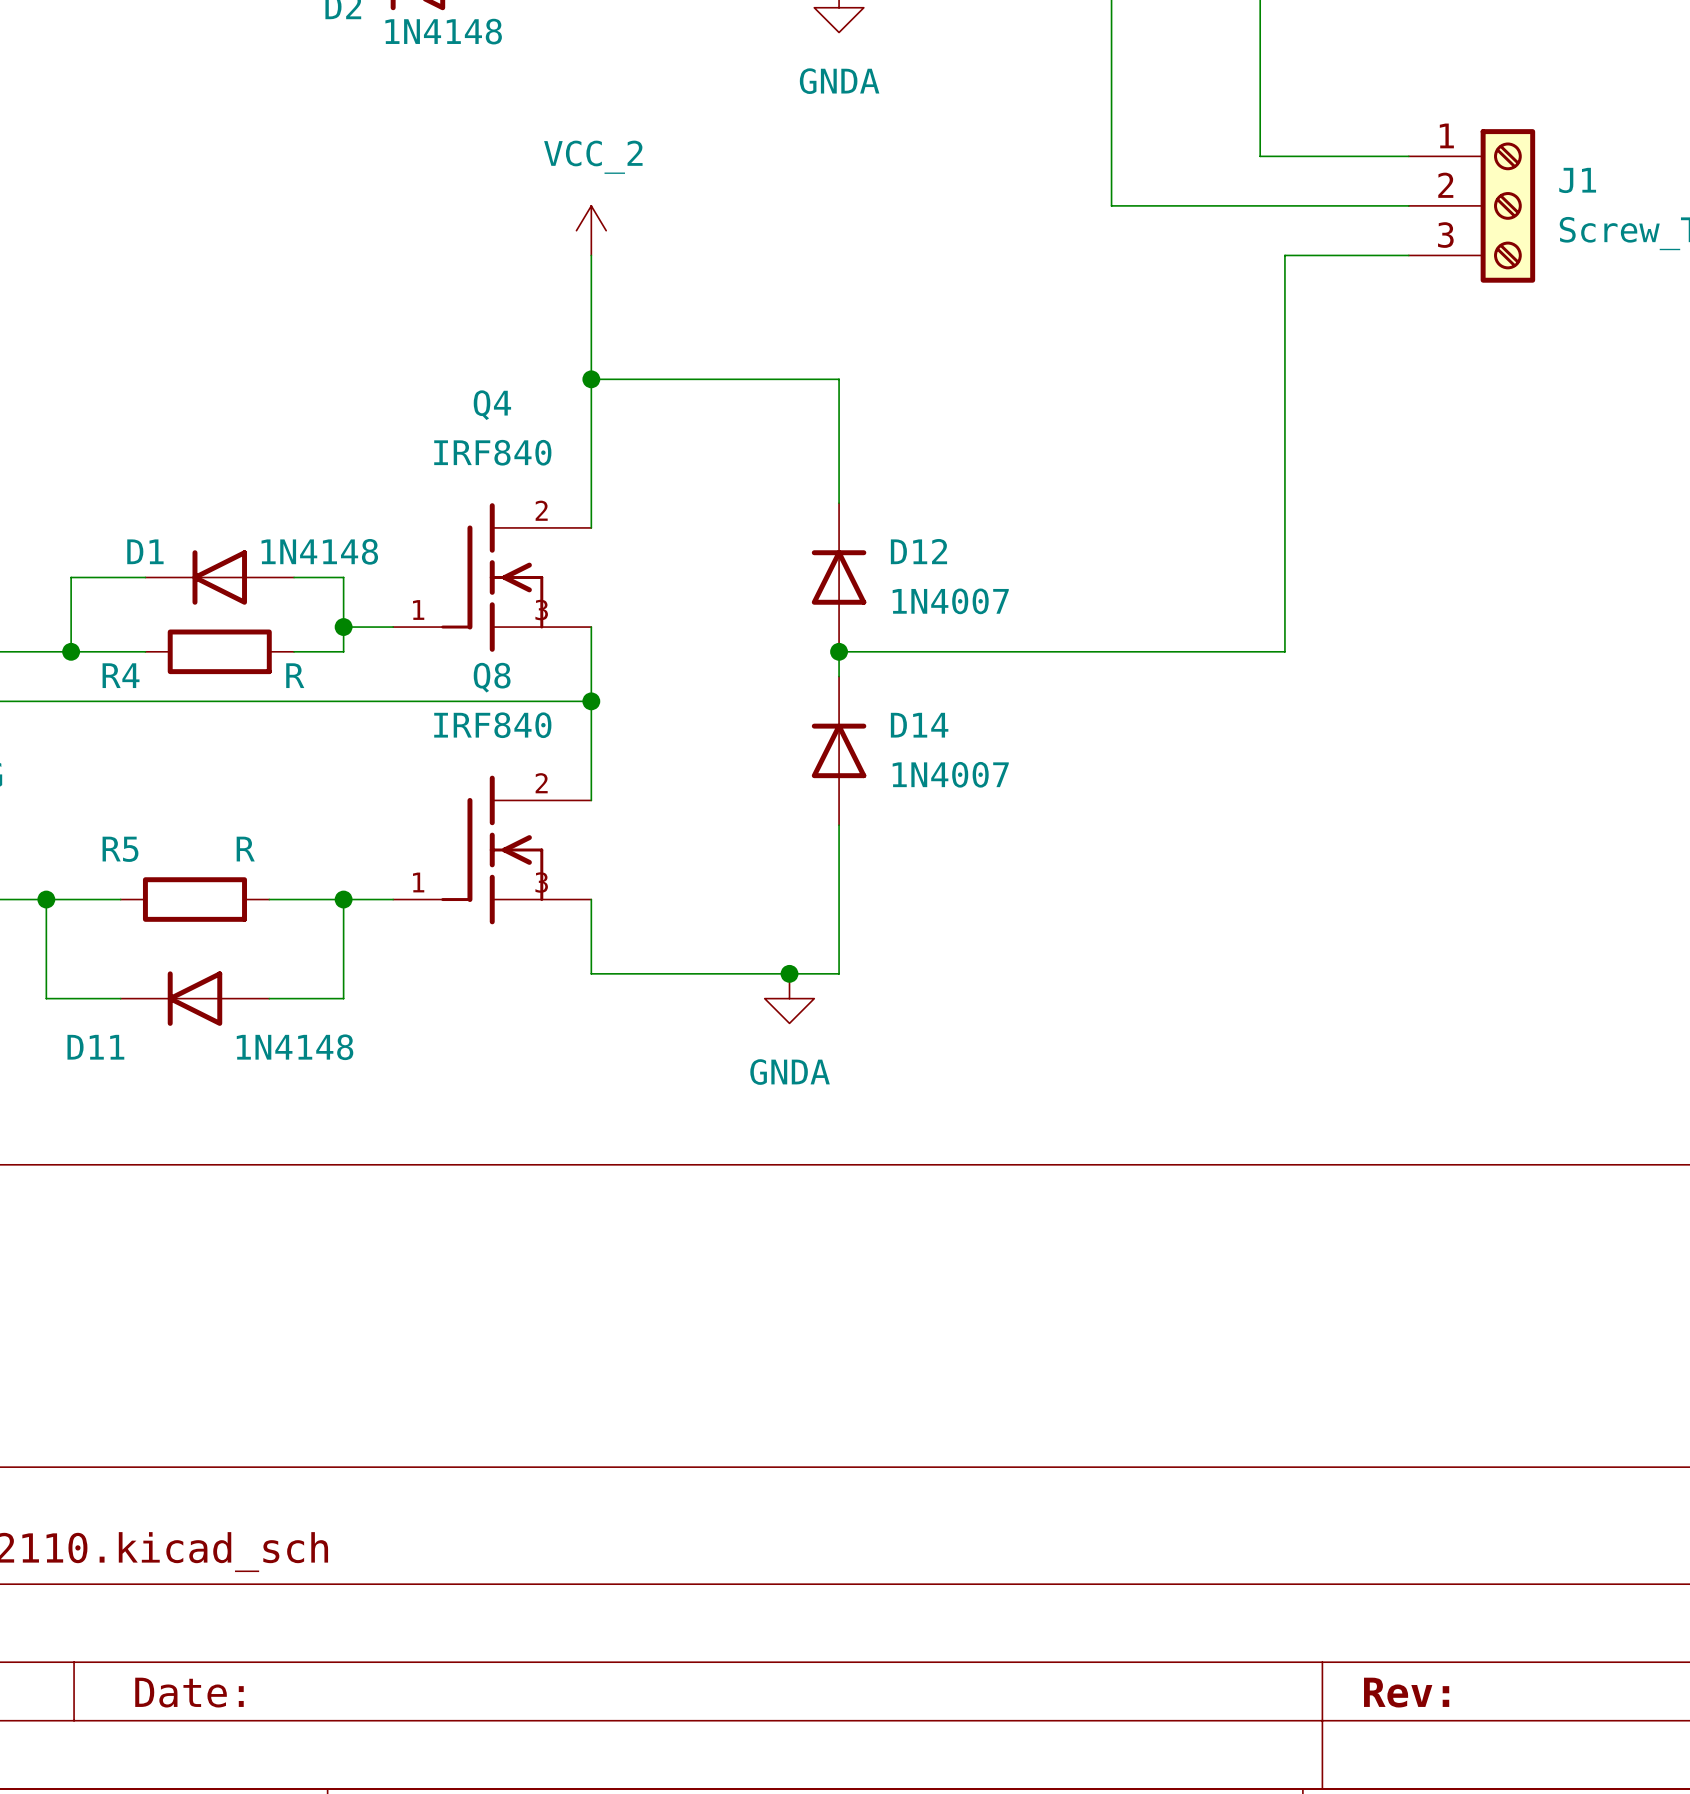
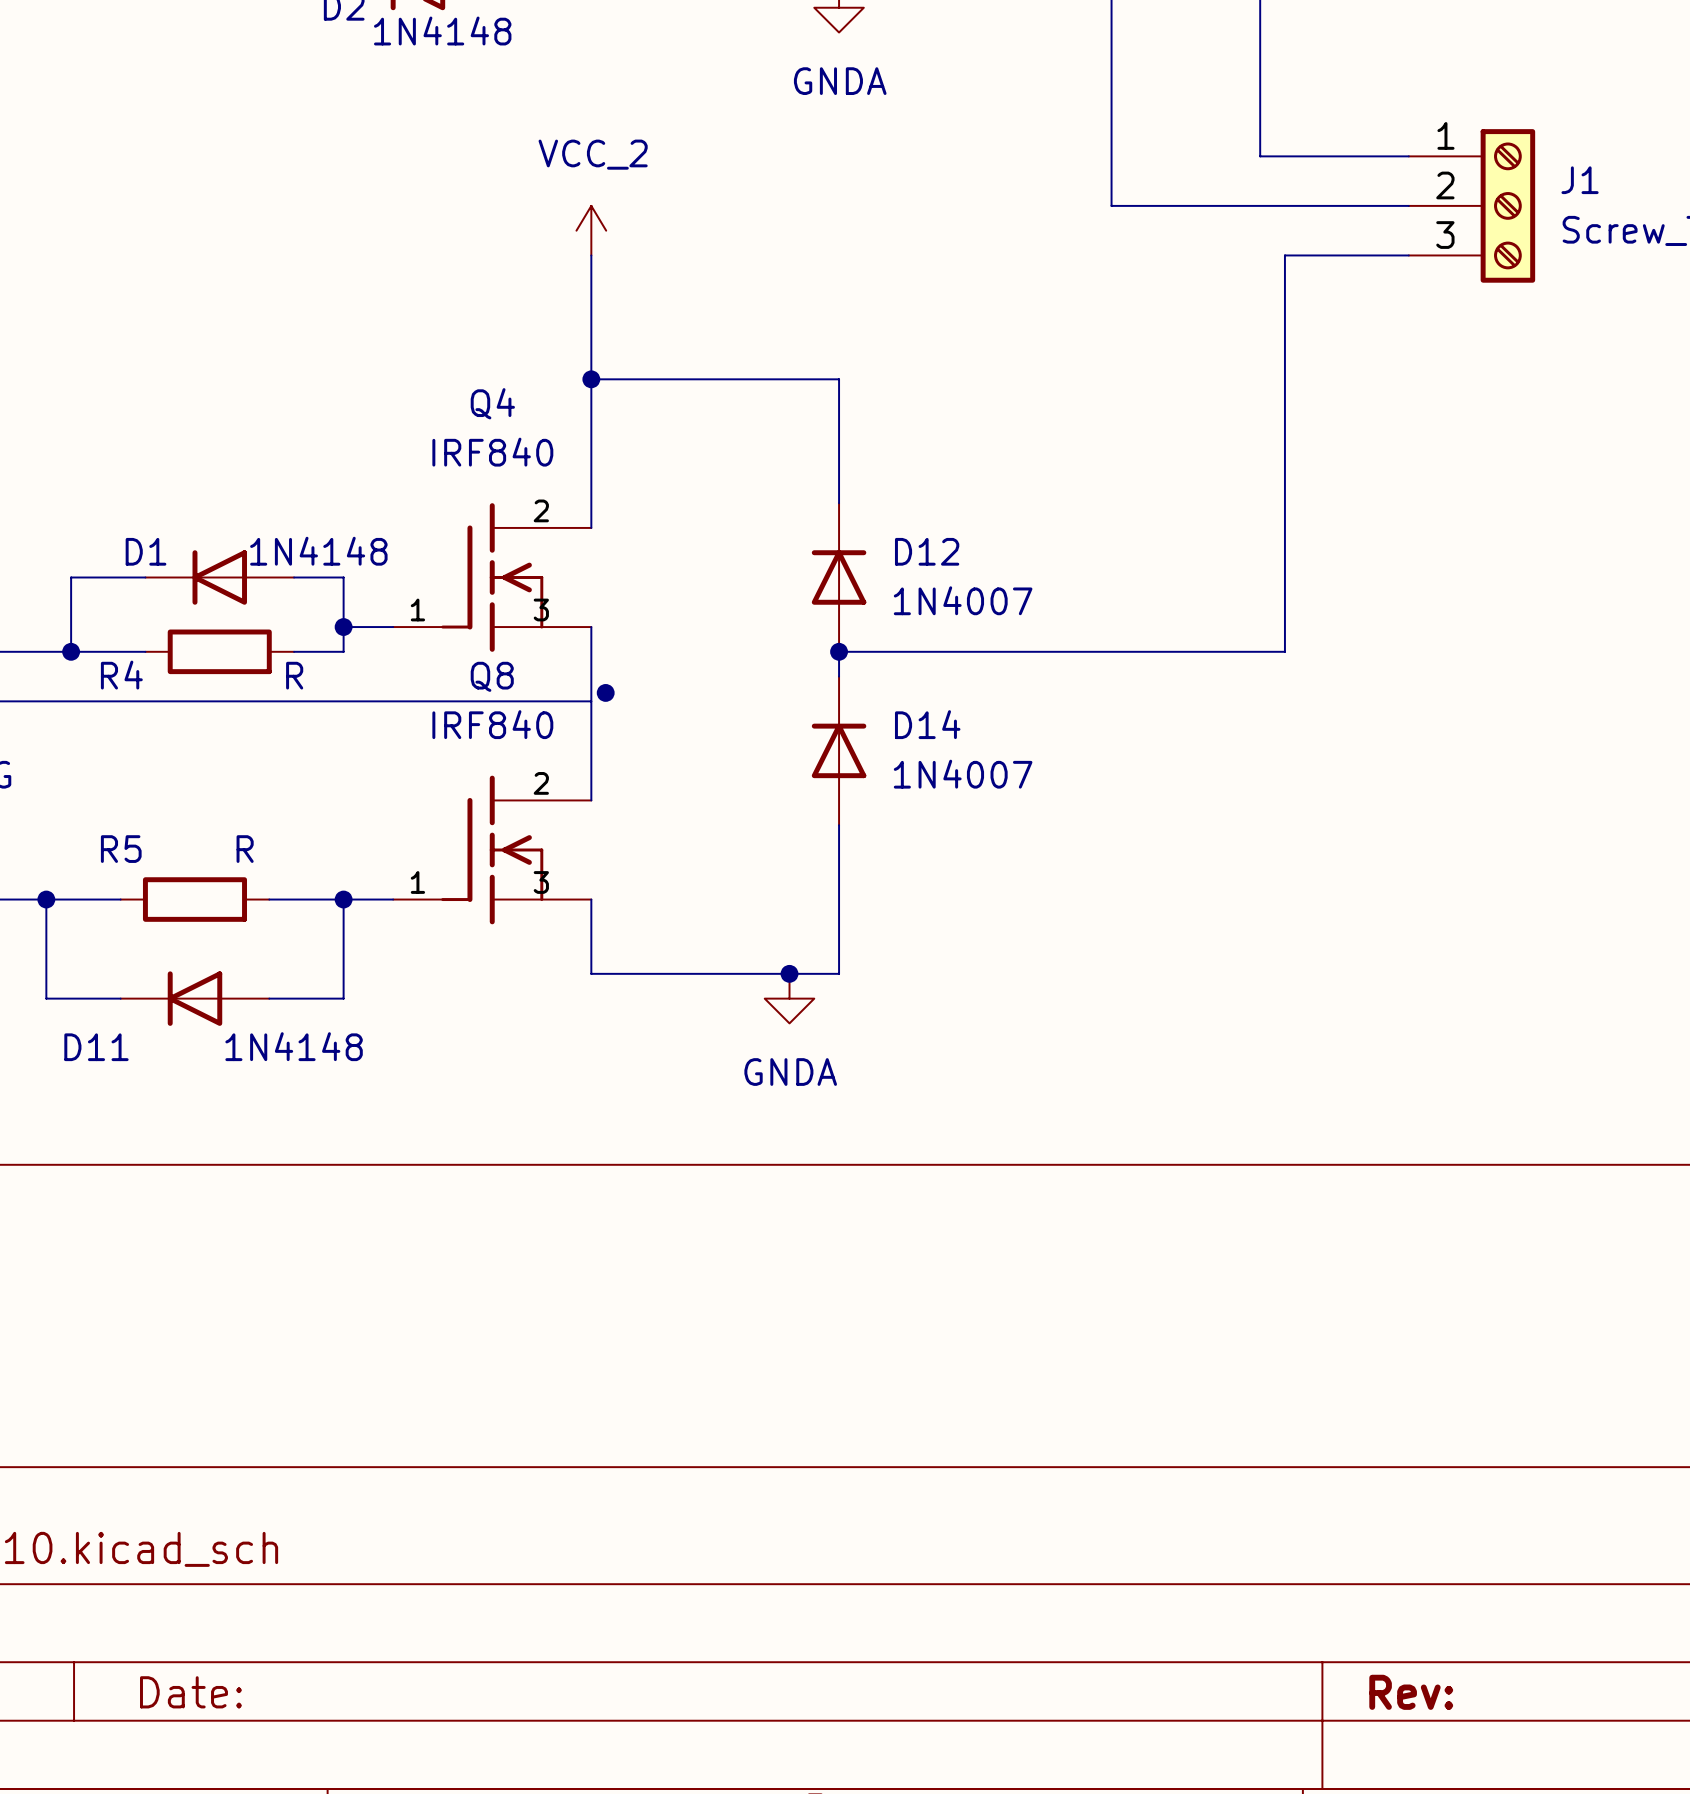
junction position: (591, 701) -> (605, 692)

